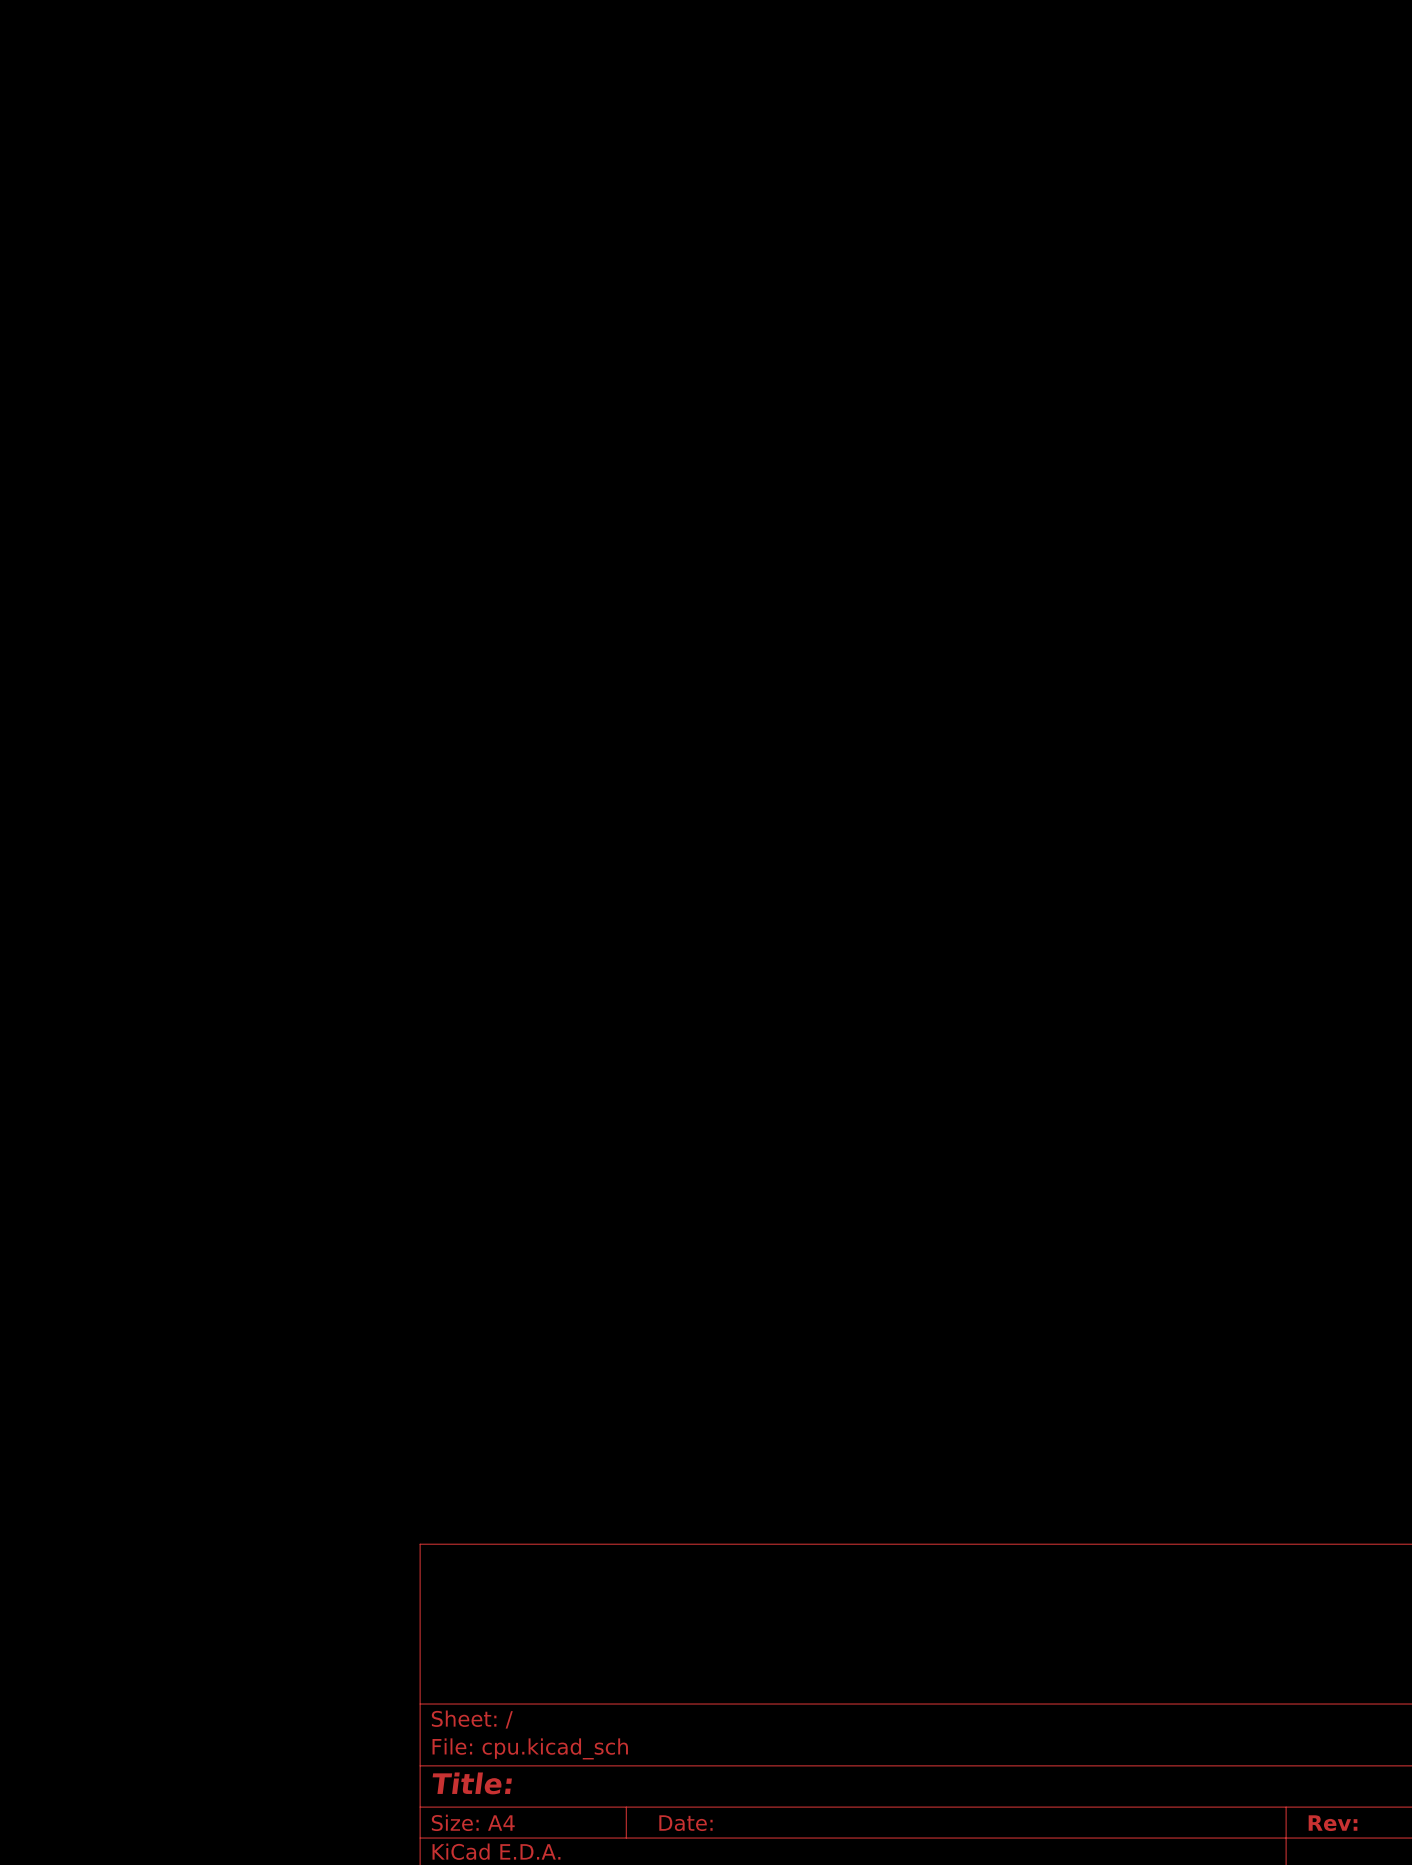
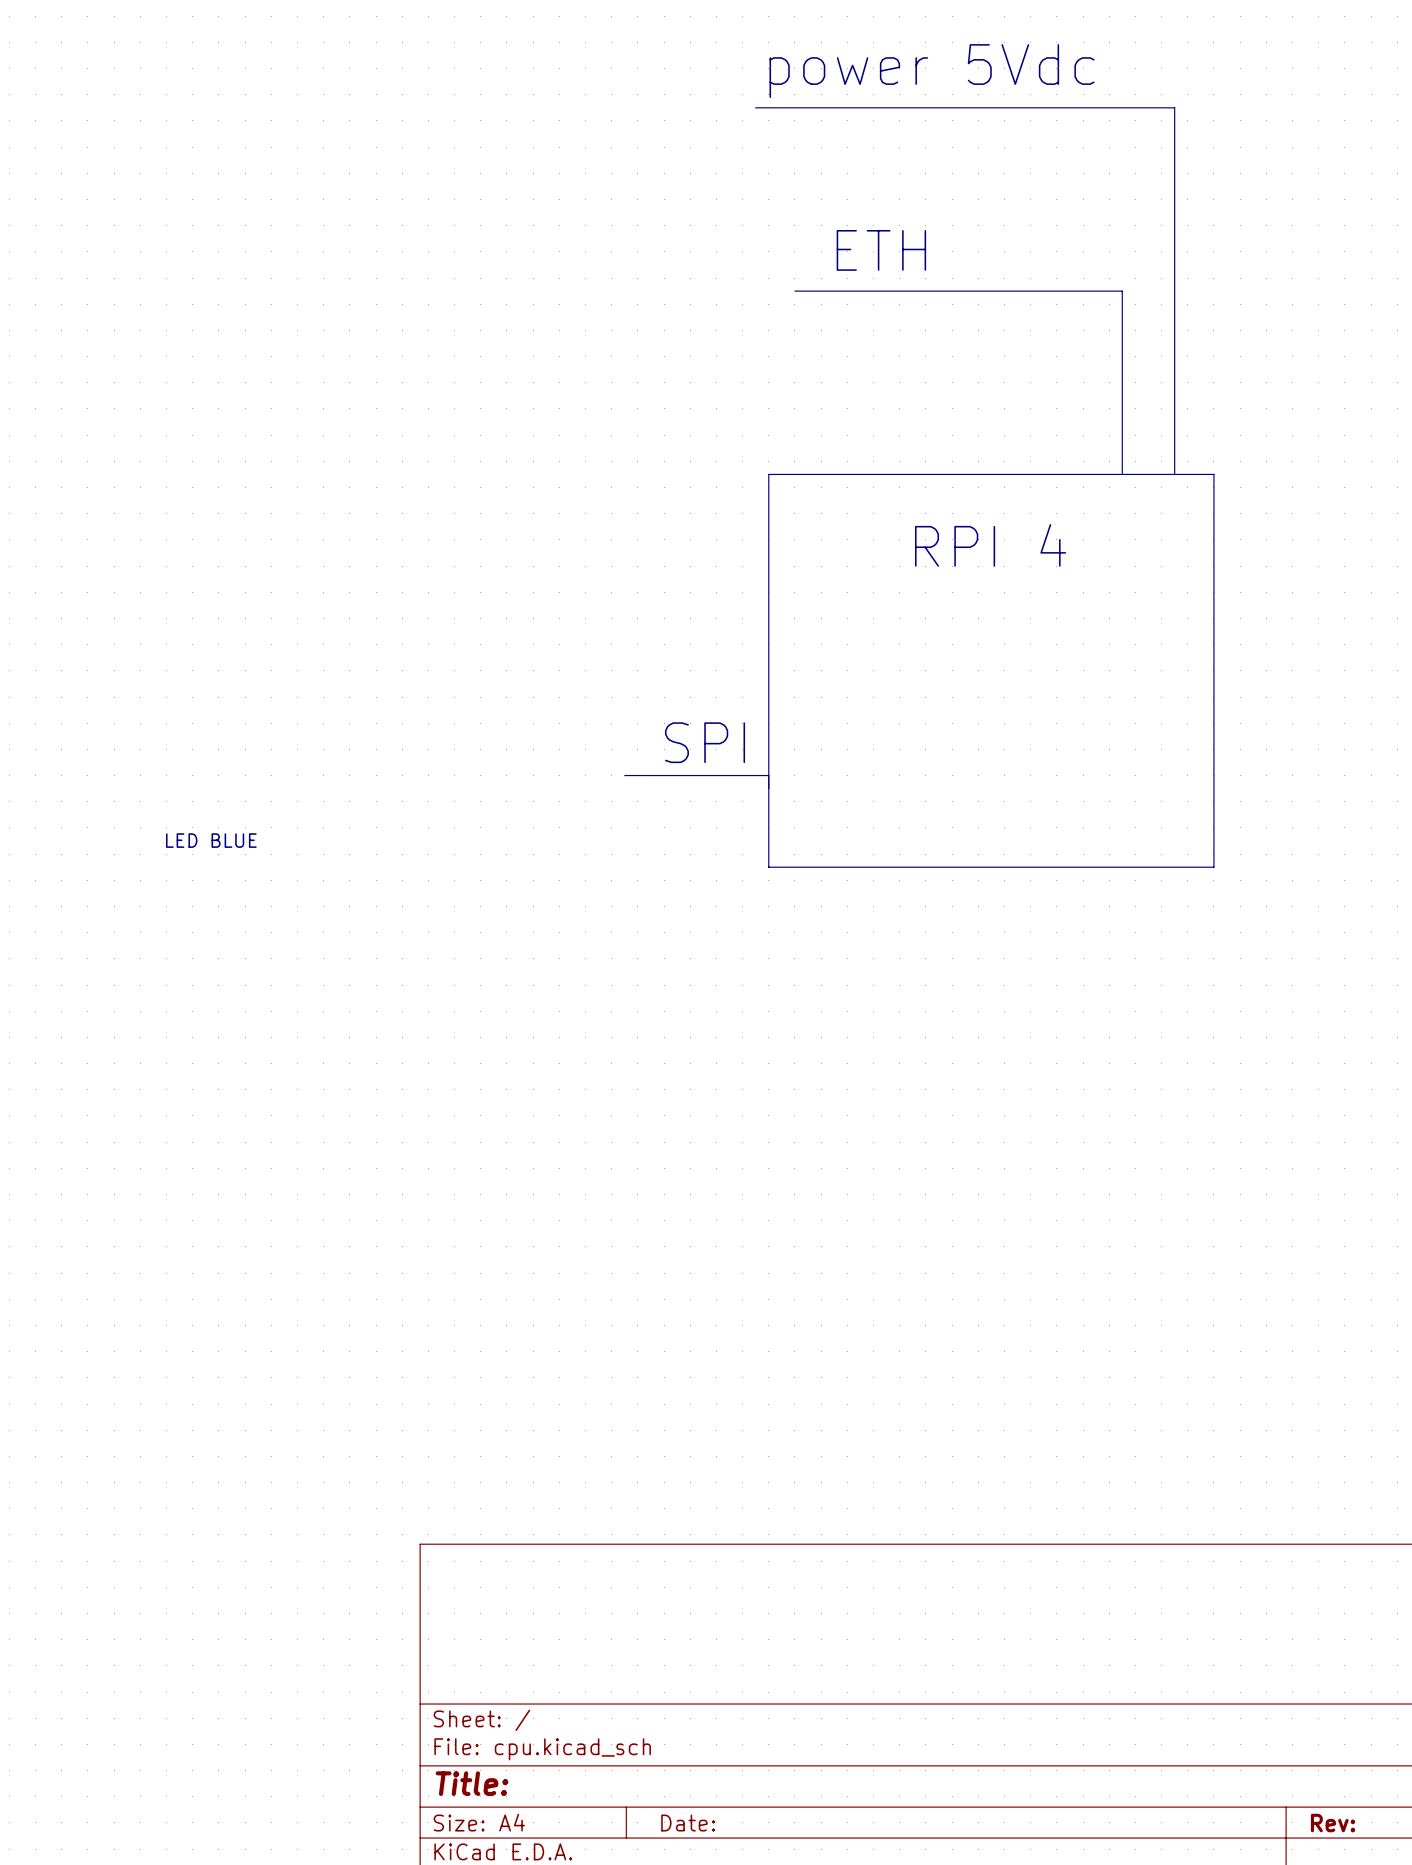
text: none -> power 5Vdc (932, 71)
bus: none -> (755, 107) (1174, 107) (1174, 474)
text: none -> ETH (881, 250)
bus: none -> (794, 291) (1122, 291) (1122, 474)
line: none -> (768, 474) (1213, 474) (1213, 867) (768, 867) (768, 474)
text: none -> RPI 4 (990, 545)
text: none -> SPI (705, 742)
bus: none -> (624, 775) (768, 775) (768, 788)
text: none -> LED BLUE (211, 840)

